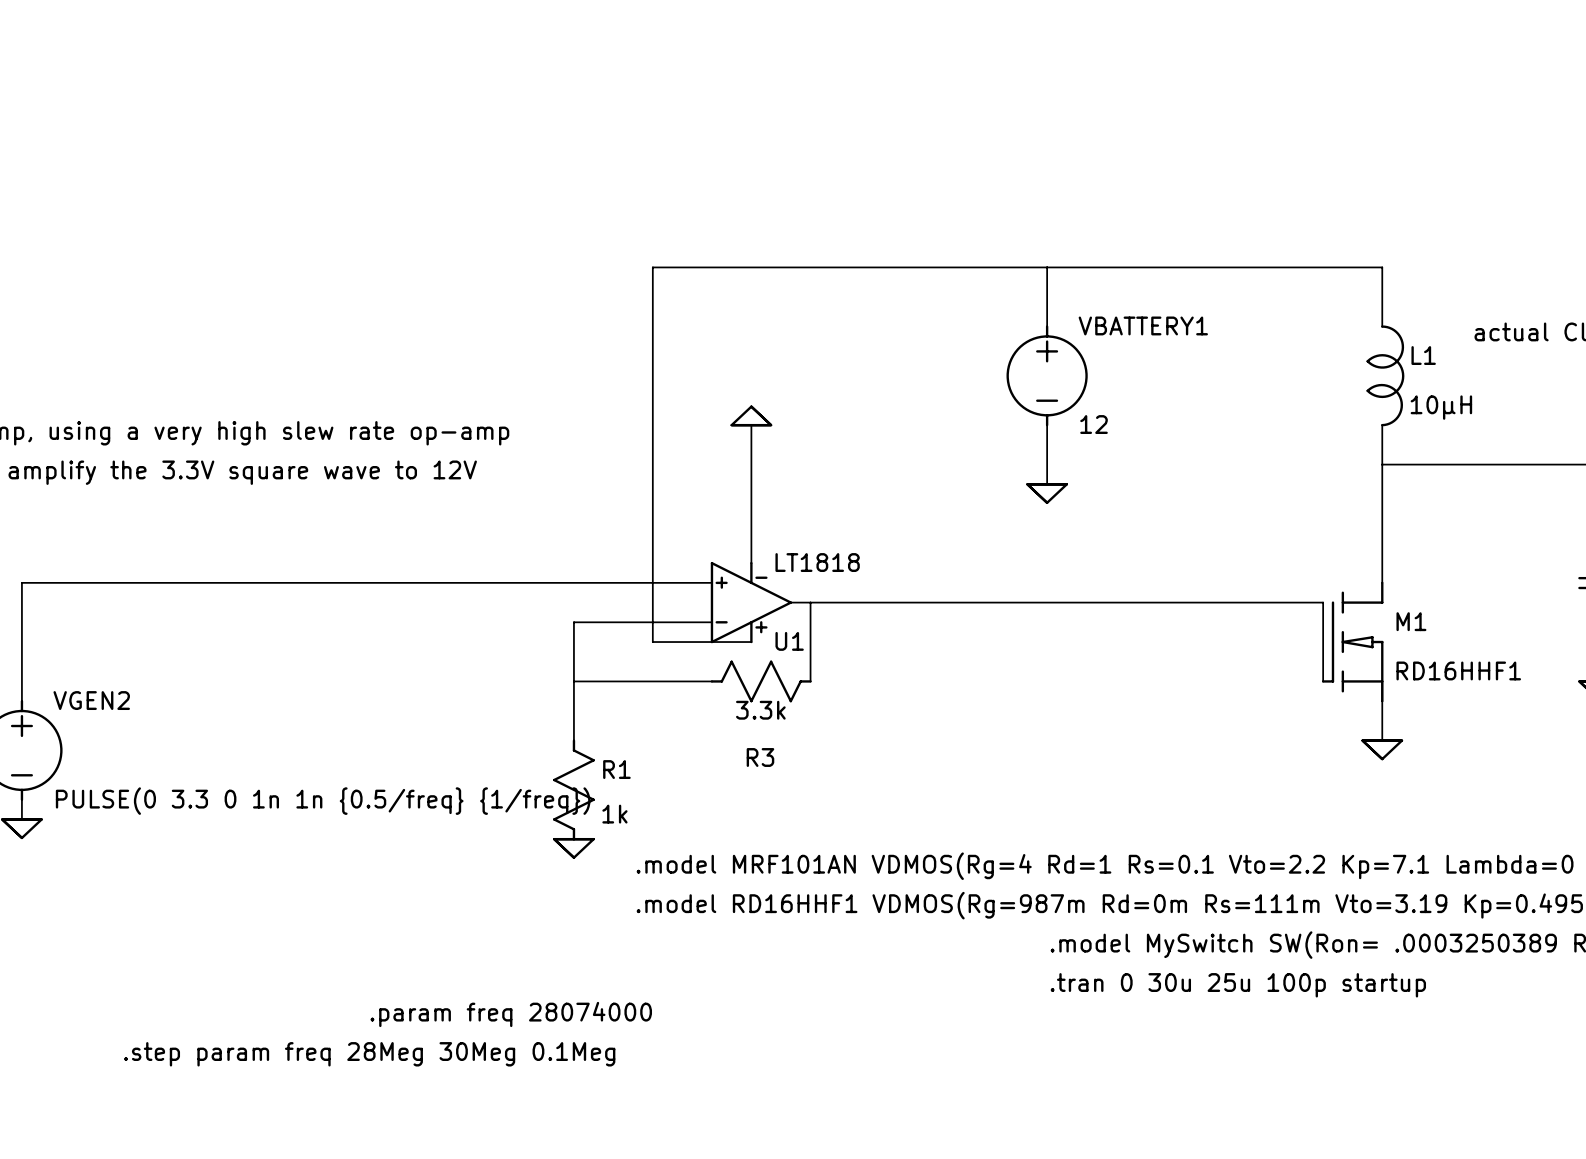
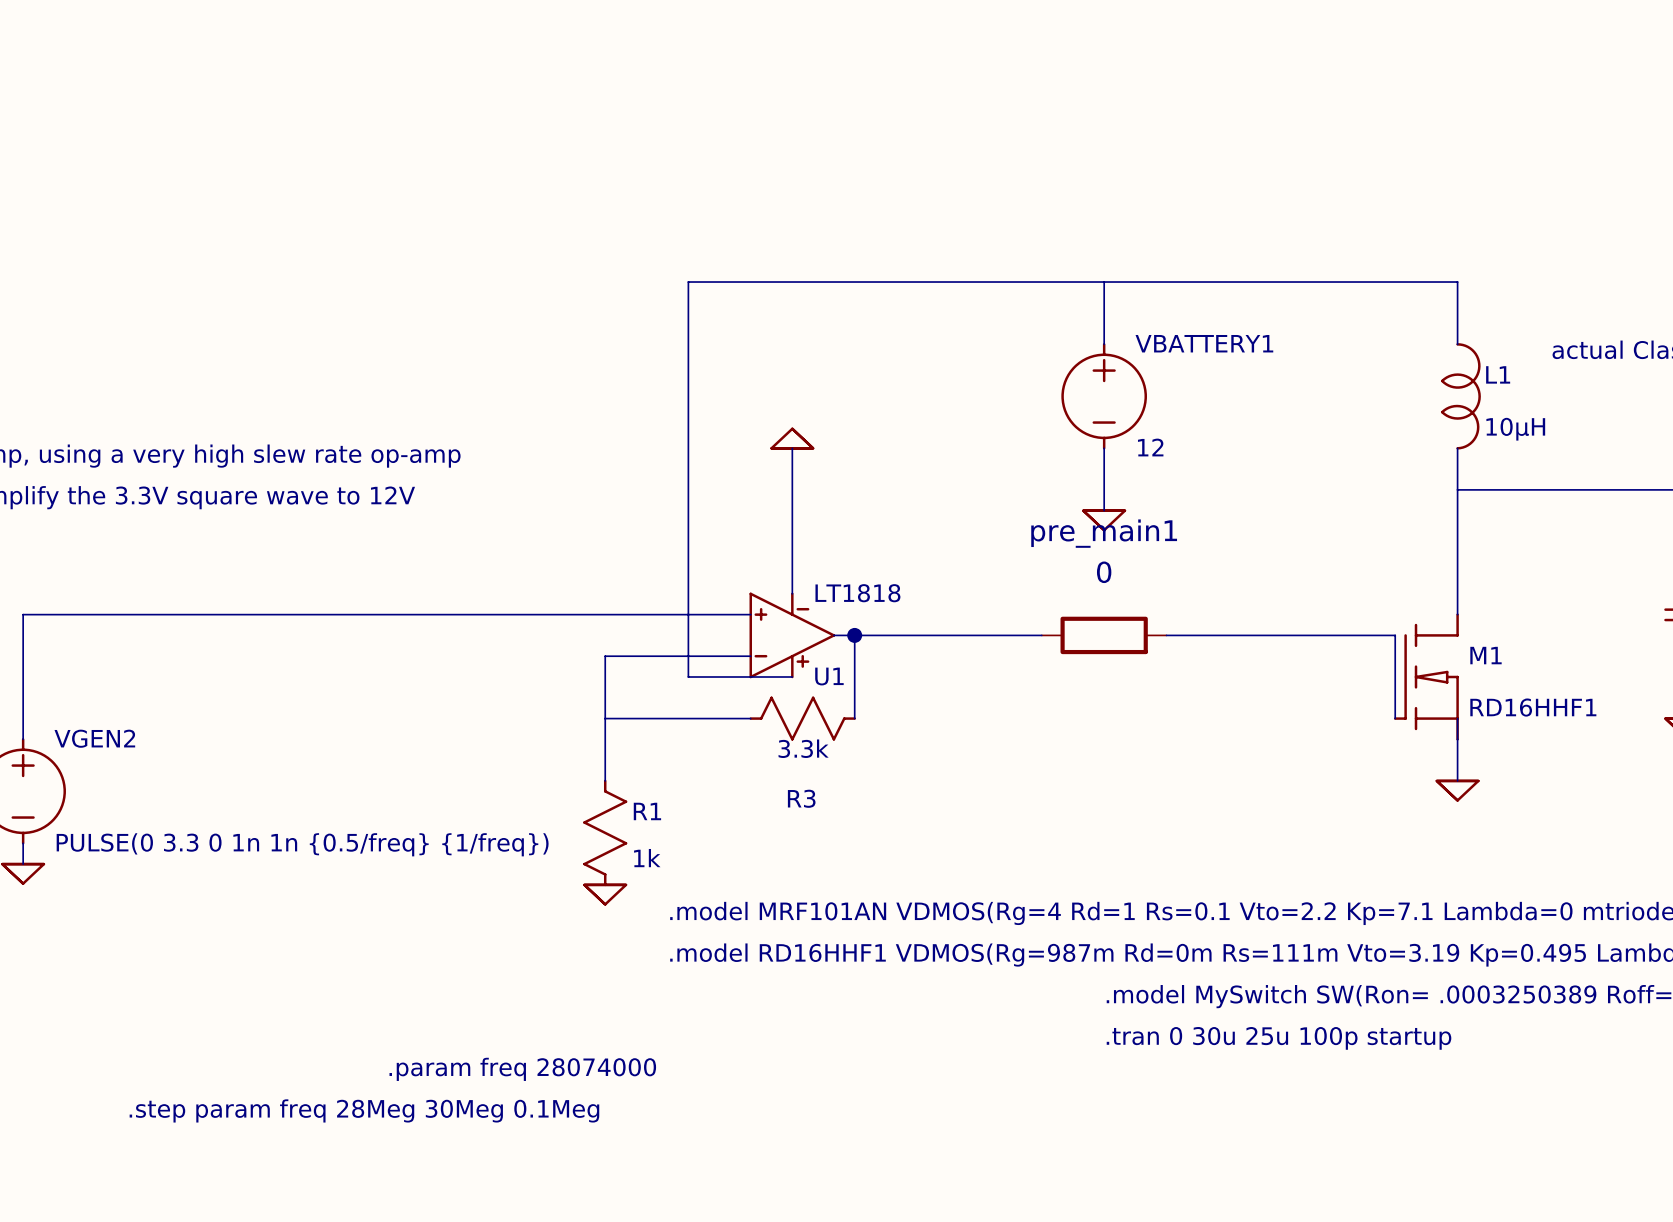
junction: none -> (854, 635)
wire: (987, 602) (1106, 602) -> none
pre_main1: none -> 0 (1104, 635)

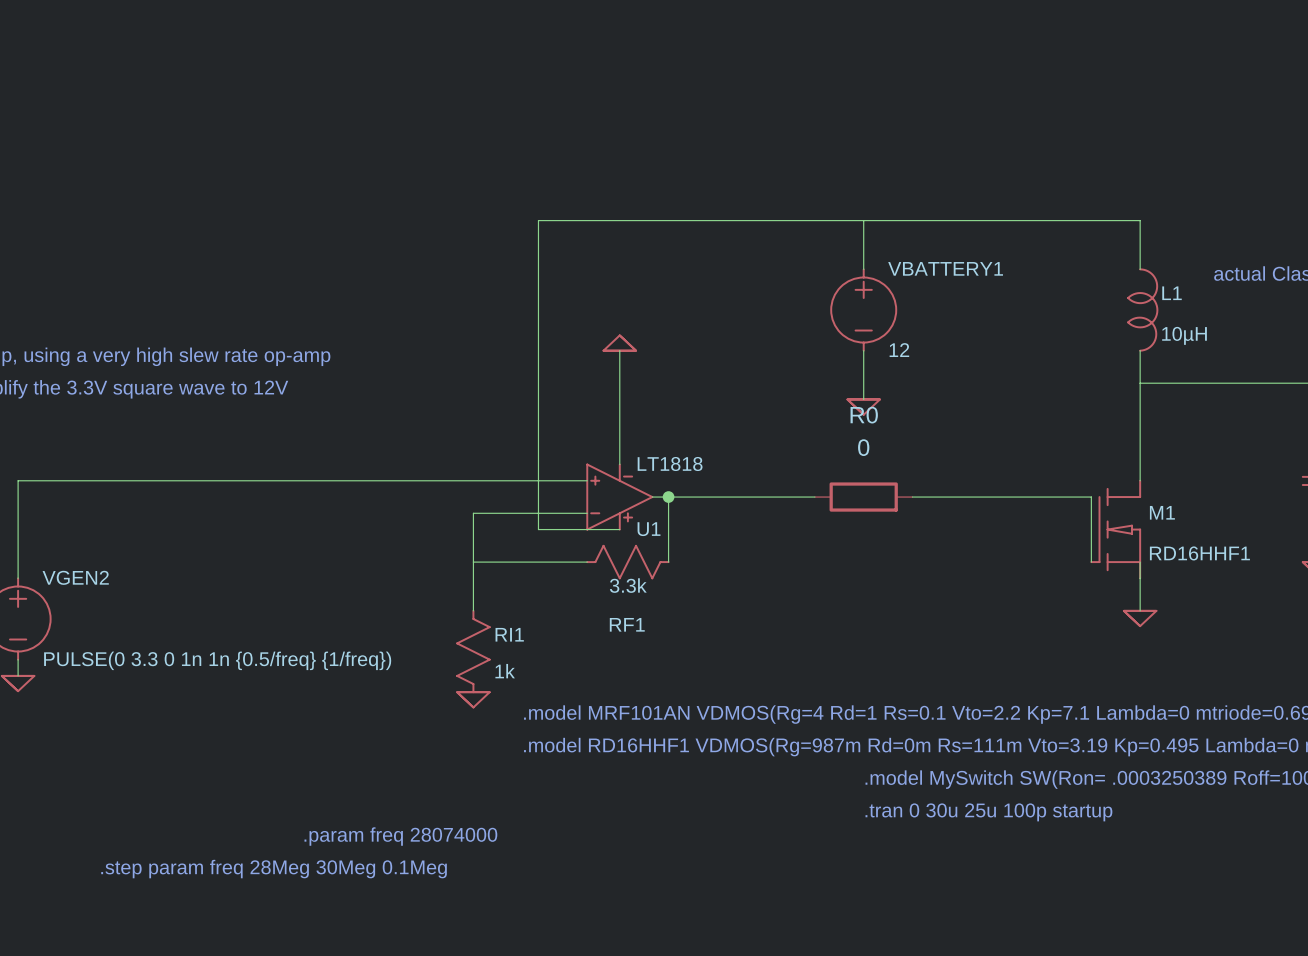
pre_main1 name: pre_main1 (1104, 533) -> R0 (864, 415)
R3 name: R3 (801, 798) -> RF1 (627, 624)
R1 name: R1 (647, 811) -> RI1 (509, 634)

